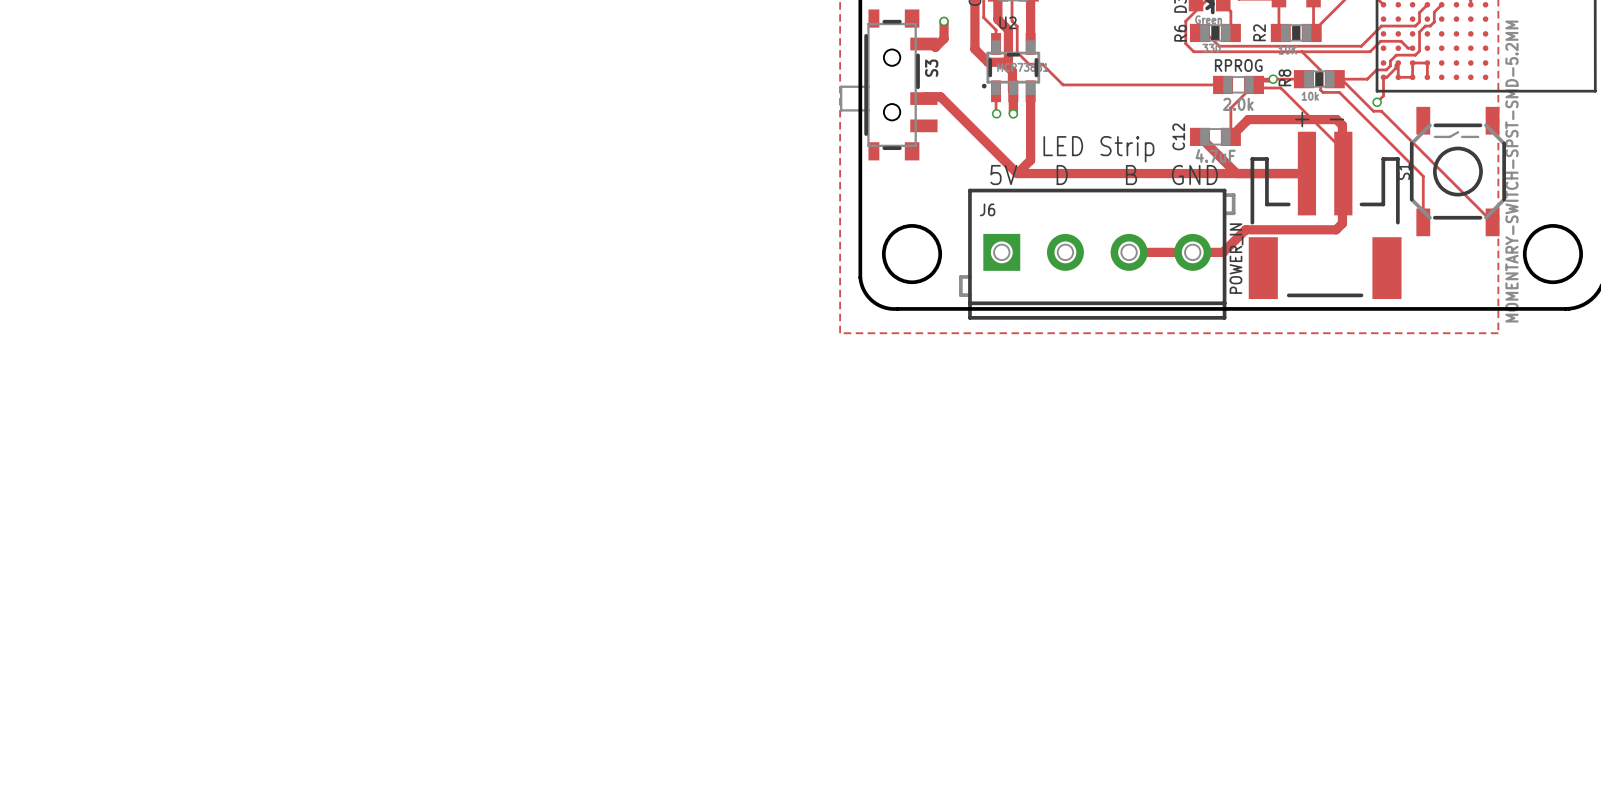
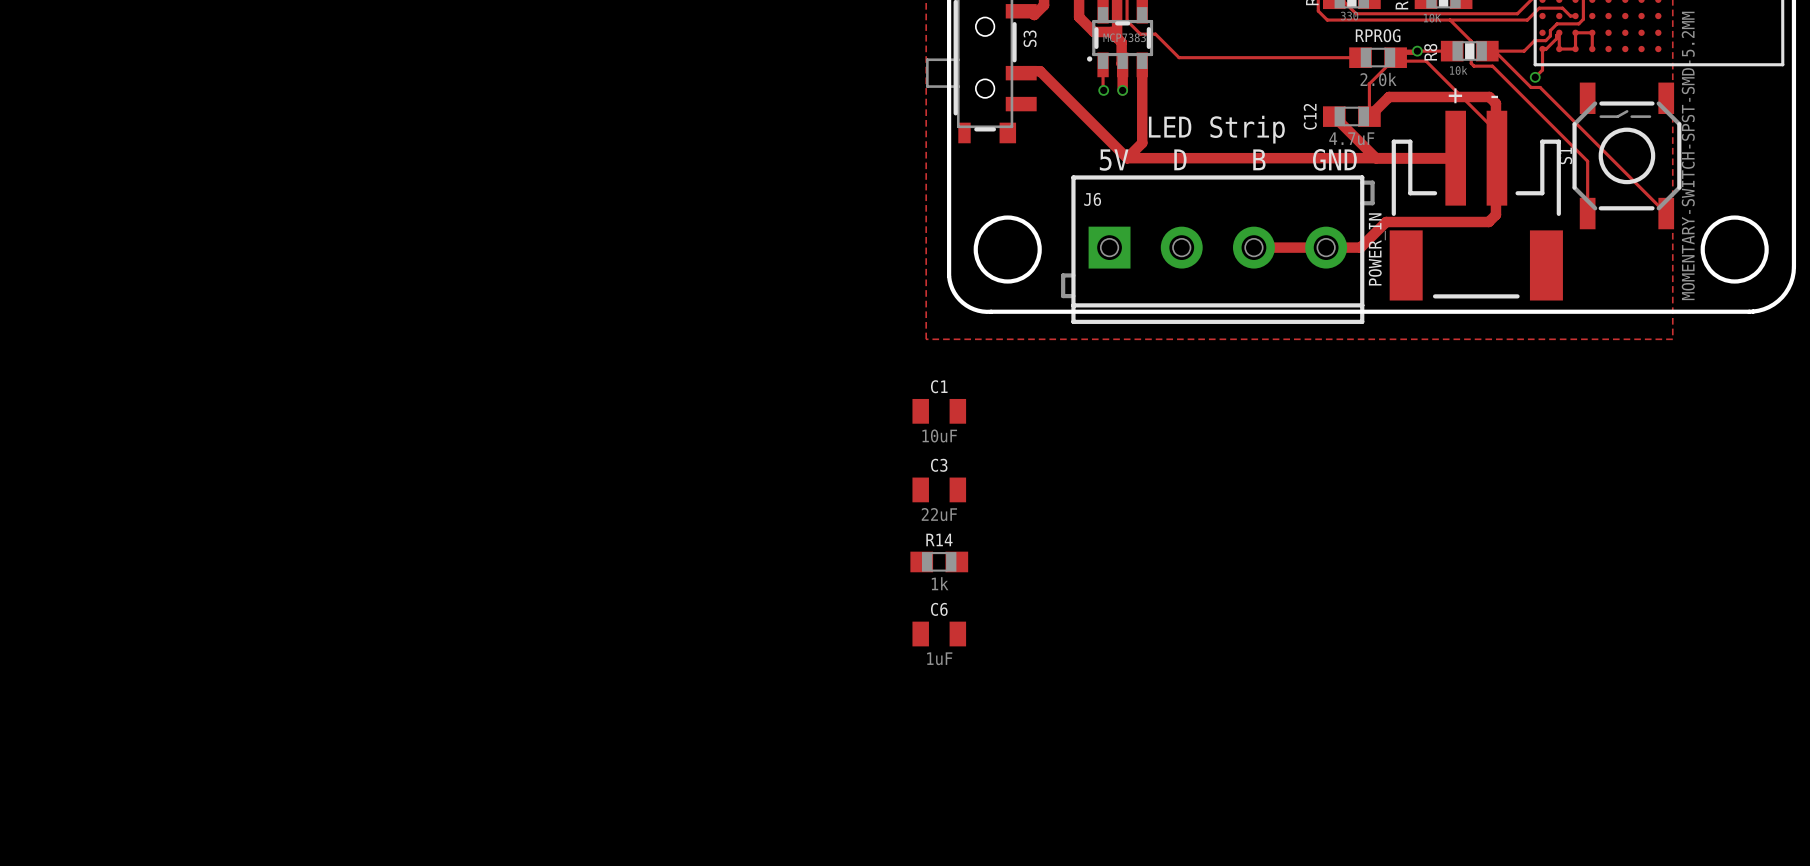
C1: none -> 10uF (939, 411)
C3: none -> 22uF (939, 489)
R14: none -> 1k (939, 561)
C6: none -> 1uF (939, 634)

